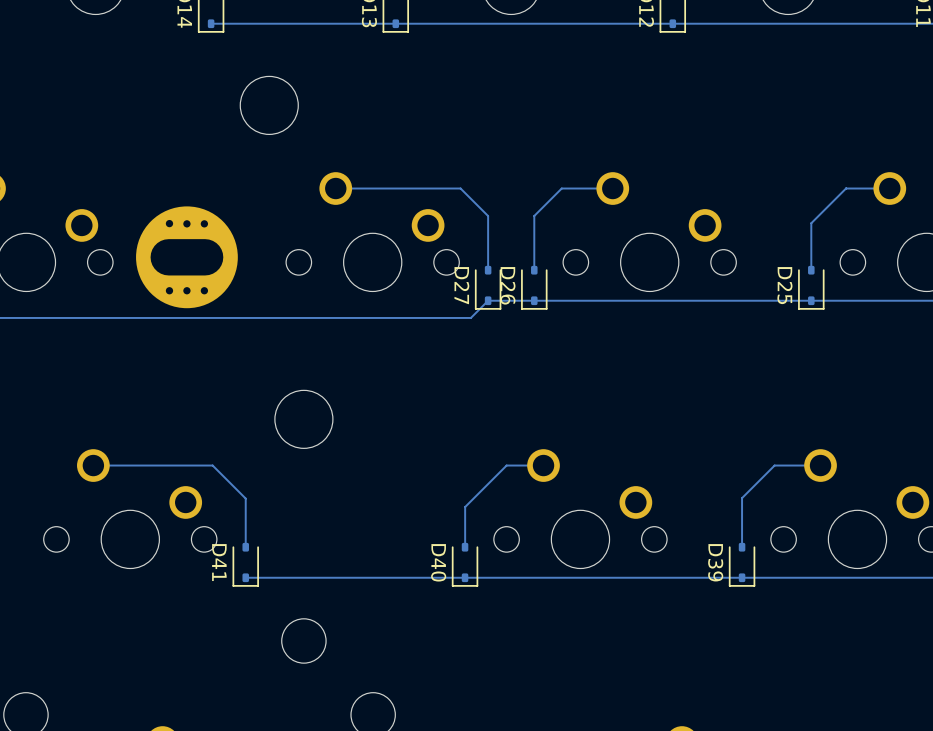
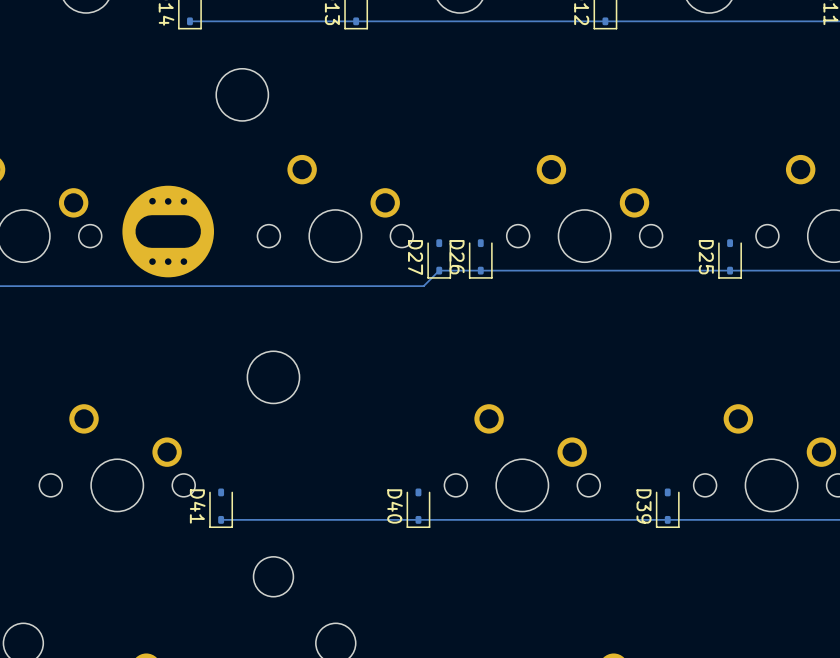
track: (335, 188) (460, 188) (488, 216) (488, 270) -> none
track: (612, 188) (561, 188) (534, 215) (534, 270) -> none
track: (846, 188) (811, 223) (811, 270) -> none
track: (889, 188) (846, 188) -> none
track: (93, 465) (212, 465) (245, 498) (245, 547) -> none
track: (543, 465) (506, 465) (465, 507) (465, 547) -> none
track: (820, 465) (774, 465) (742, 498) (742, 547) -> none

